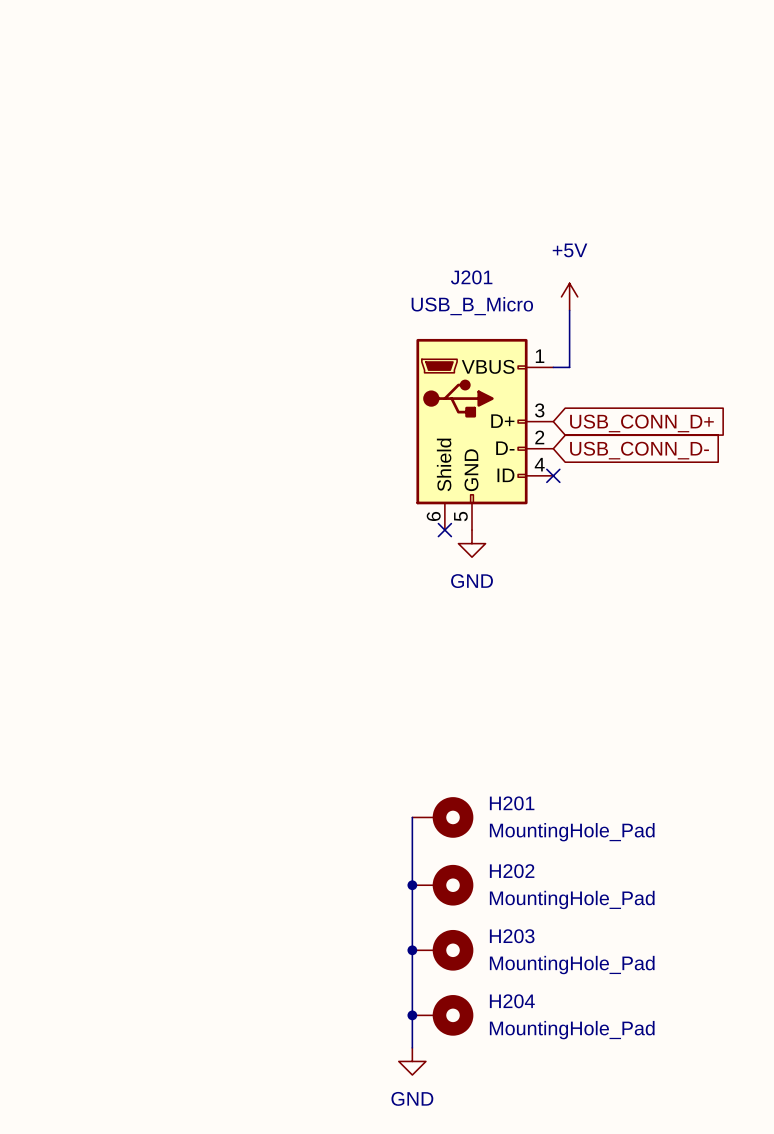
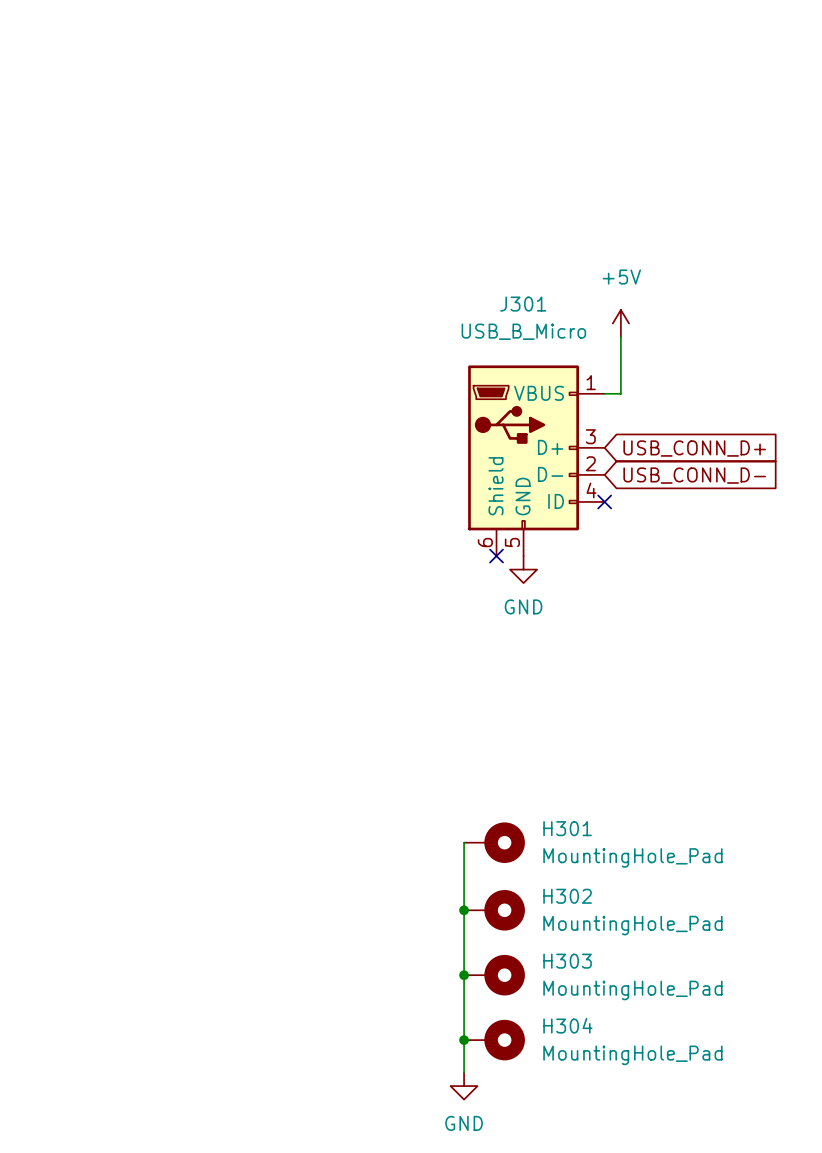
J201 name: J201 (471, 277) -> J301 (523, 304)
H201 name: H201 (512, 803) -> H301 (567, 828)
H202 name: H202 (512, 871) -> H302 (567, 896)
H203 name: H203 (512, 936) -> H303 (567, 961)
H204 name: H204 (512, 1001) -> H304 (567, 1025)

